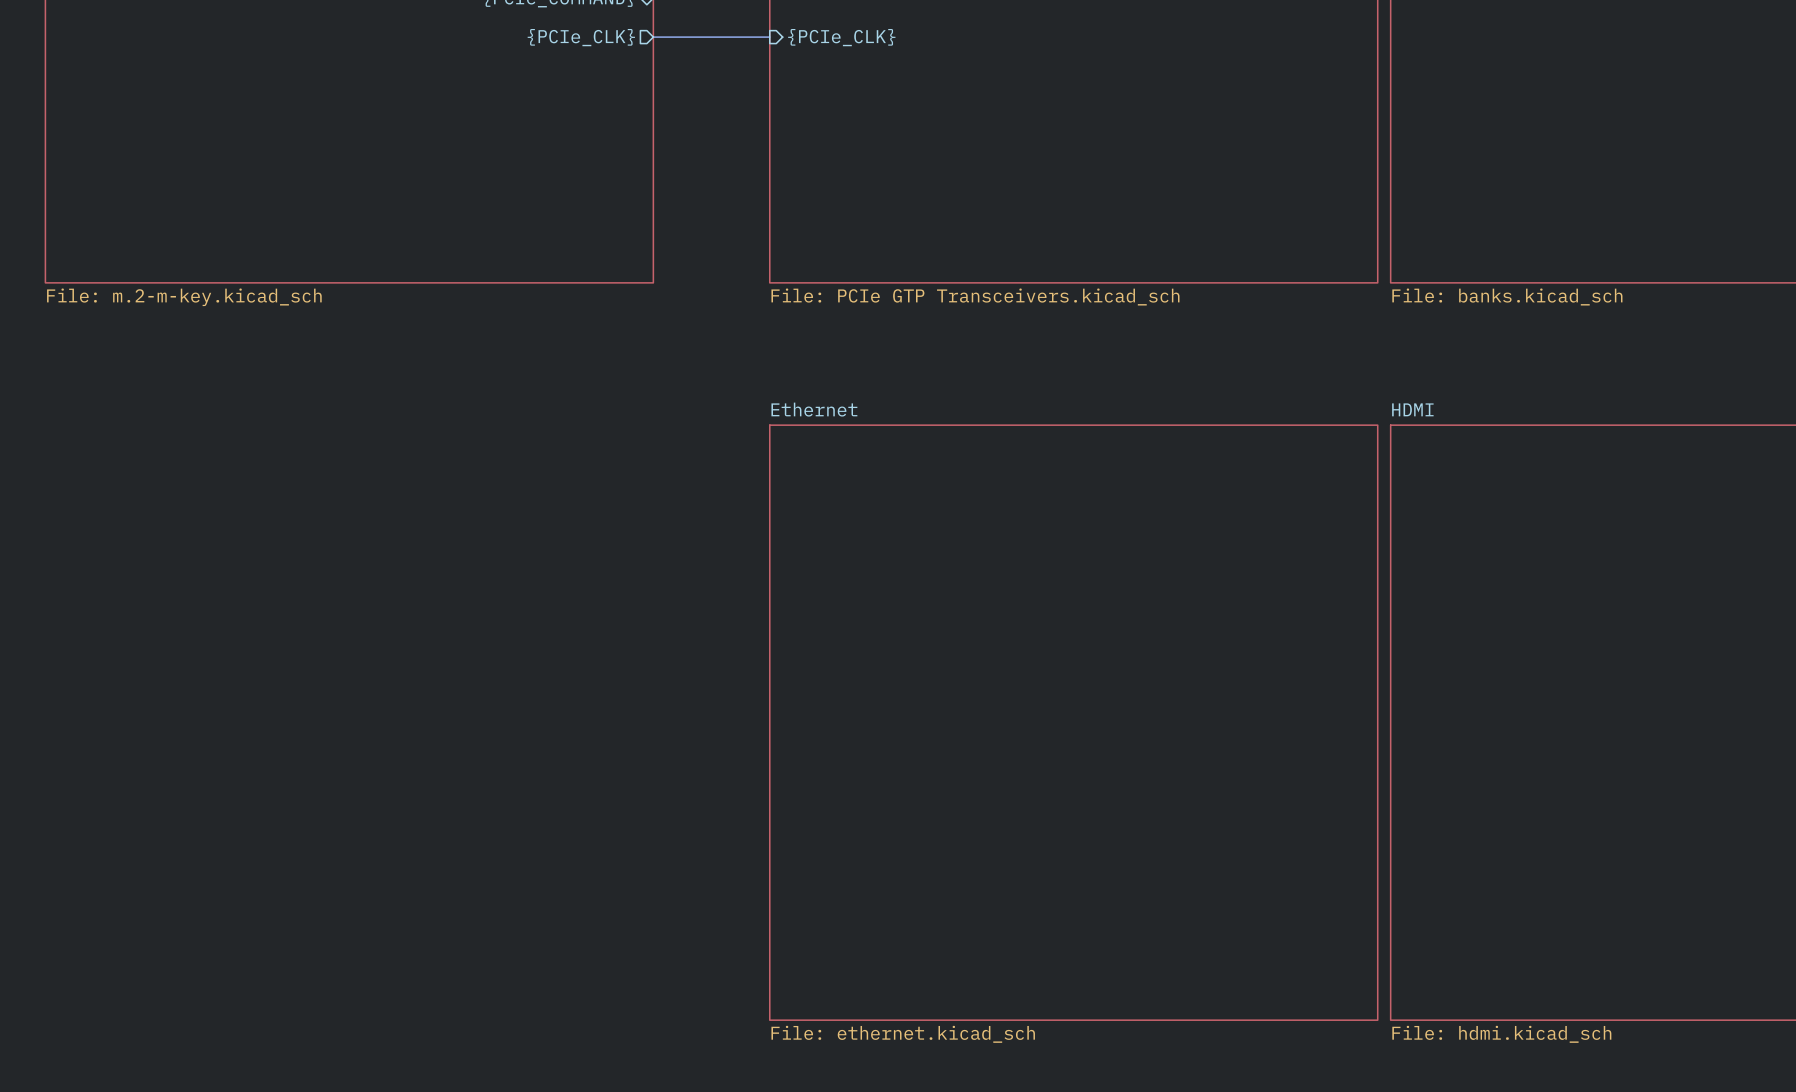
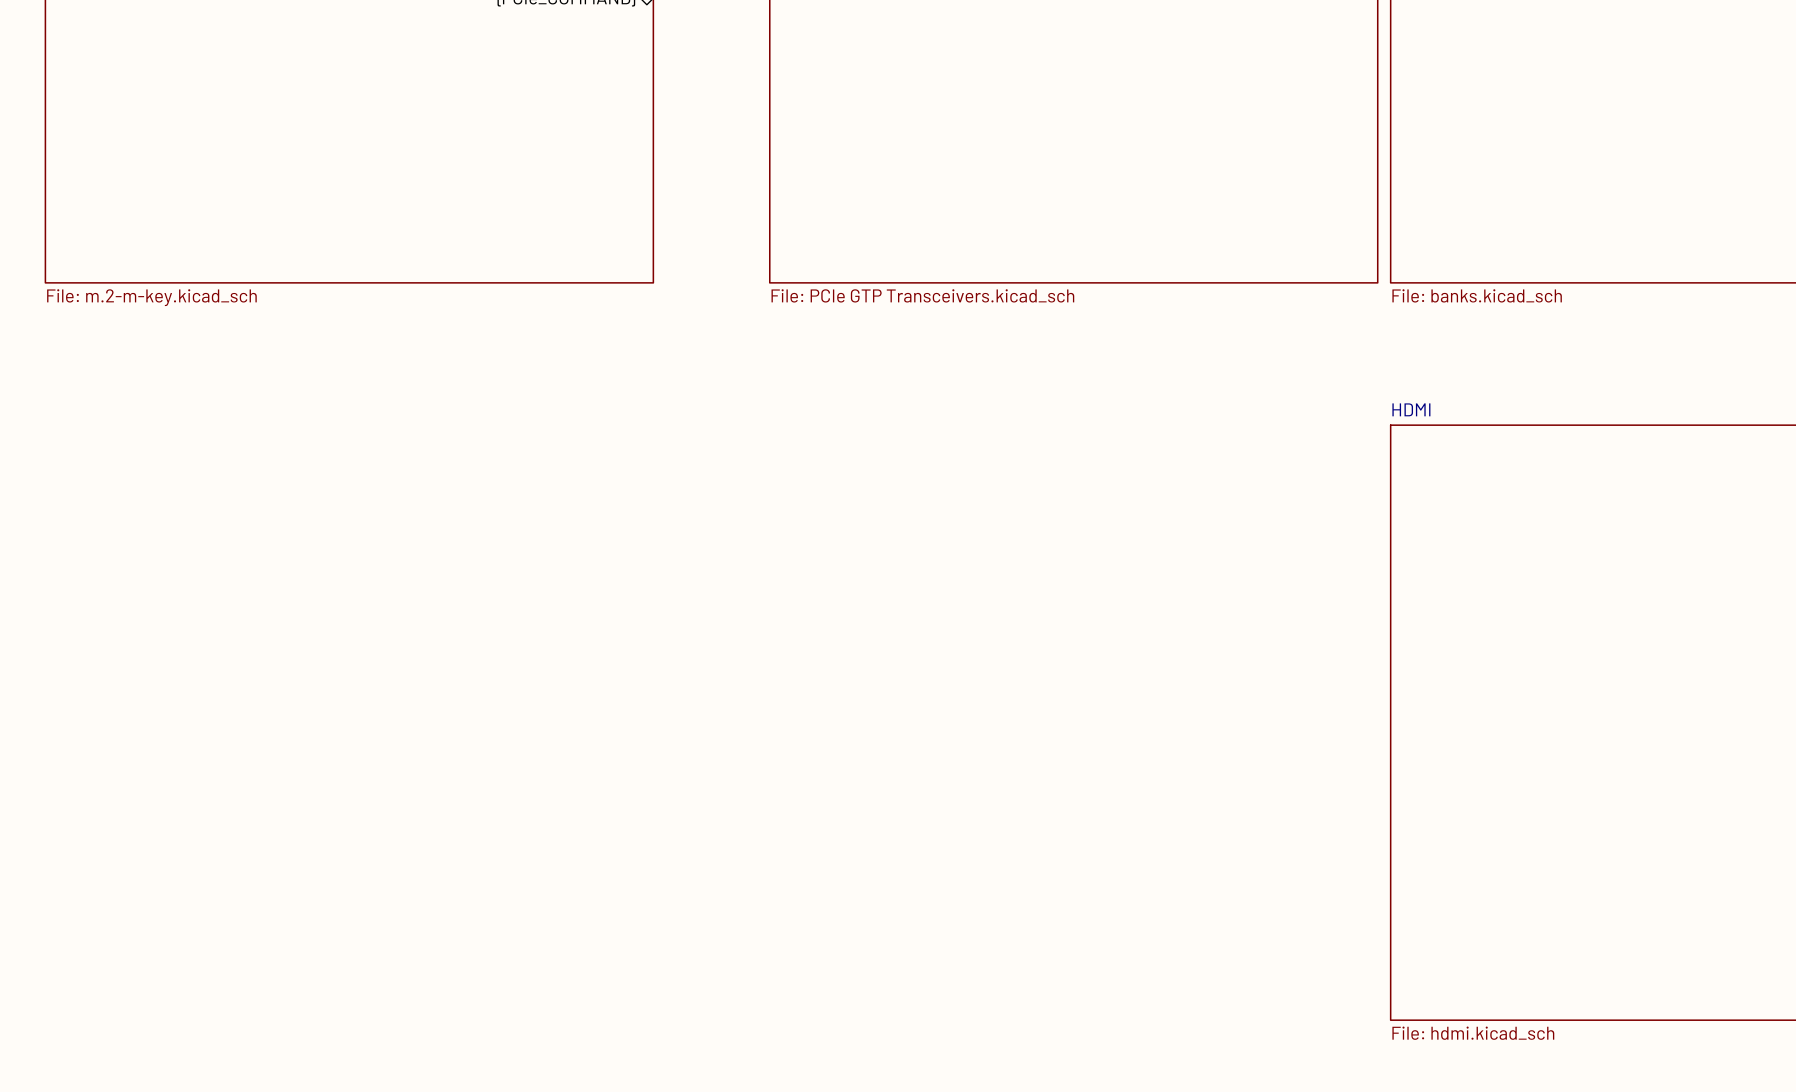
sheet pin: {PCIe_CLK} (581, 37) -> none
bus: (653, 37) (769, 37) -> none
sheet pin: {PCIe_CLK} (841, 37) -> none
sheet Ethernet: File: ethernet.kicad_sch (1073, 722) -> none

